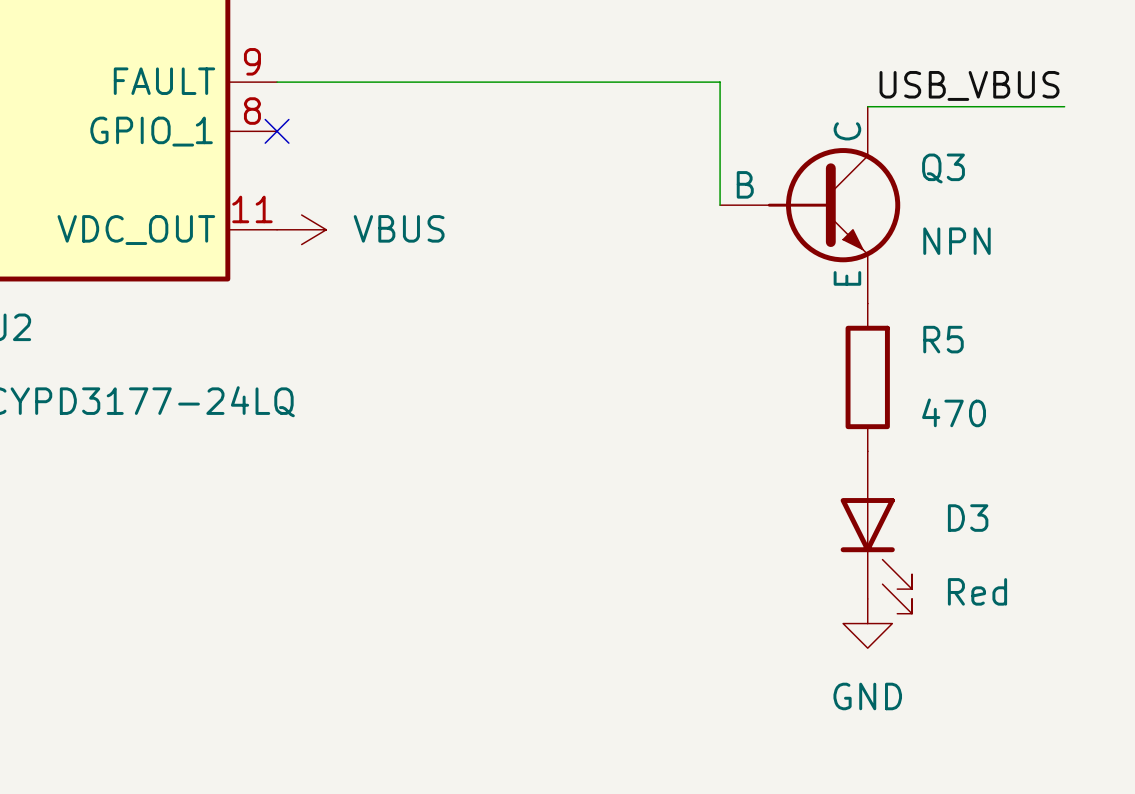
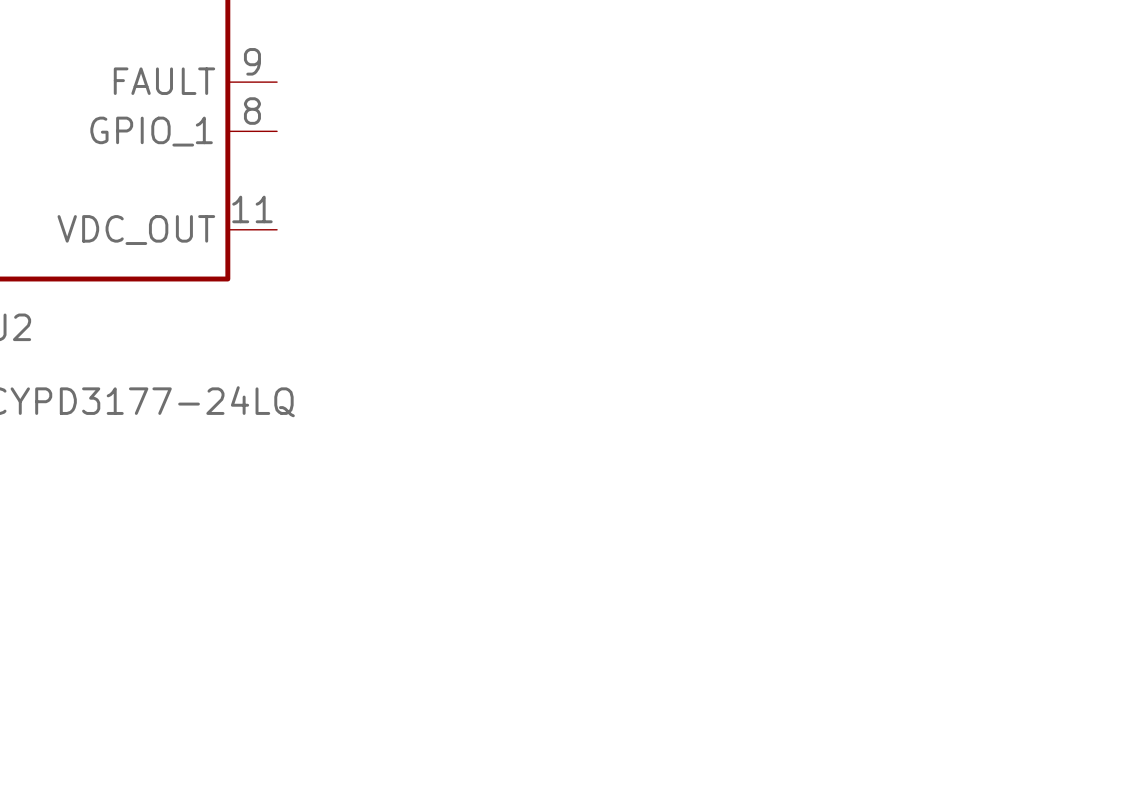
wire: (277, 82) (720, 82) (720, 205) -> none
label: USB_VBUS (969, 85) -> none
wire: (867, 106) (1064, 106) -> none
no-connect mark: (277, 131) -> none
Q3: NPN (810, 205) -> none
power symbol: VBUS (301, 229) -> none
R5: 470 (867, 377) -> none
D3: Red (876, 532) -> none
power symbol: GND (867, 623) -> none

